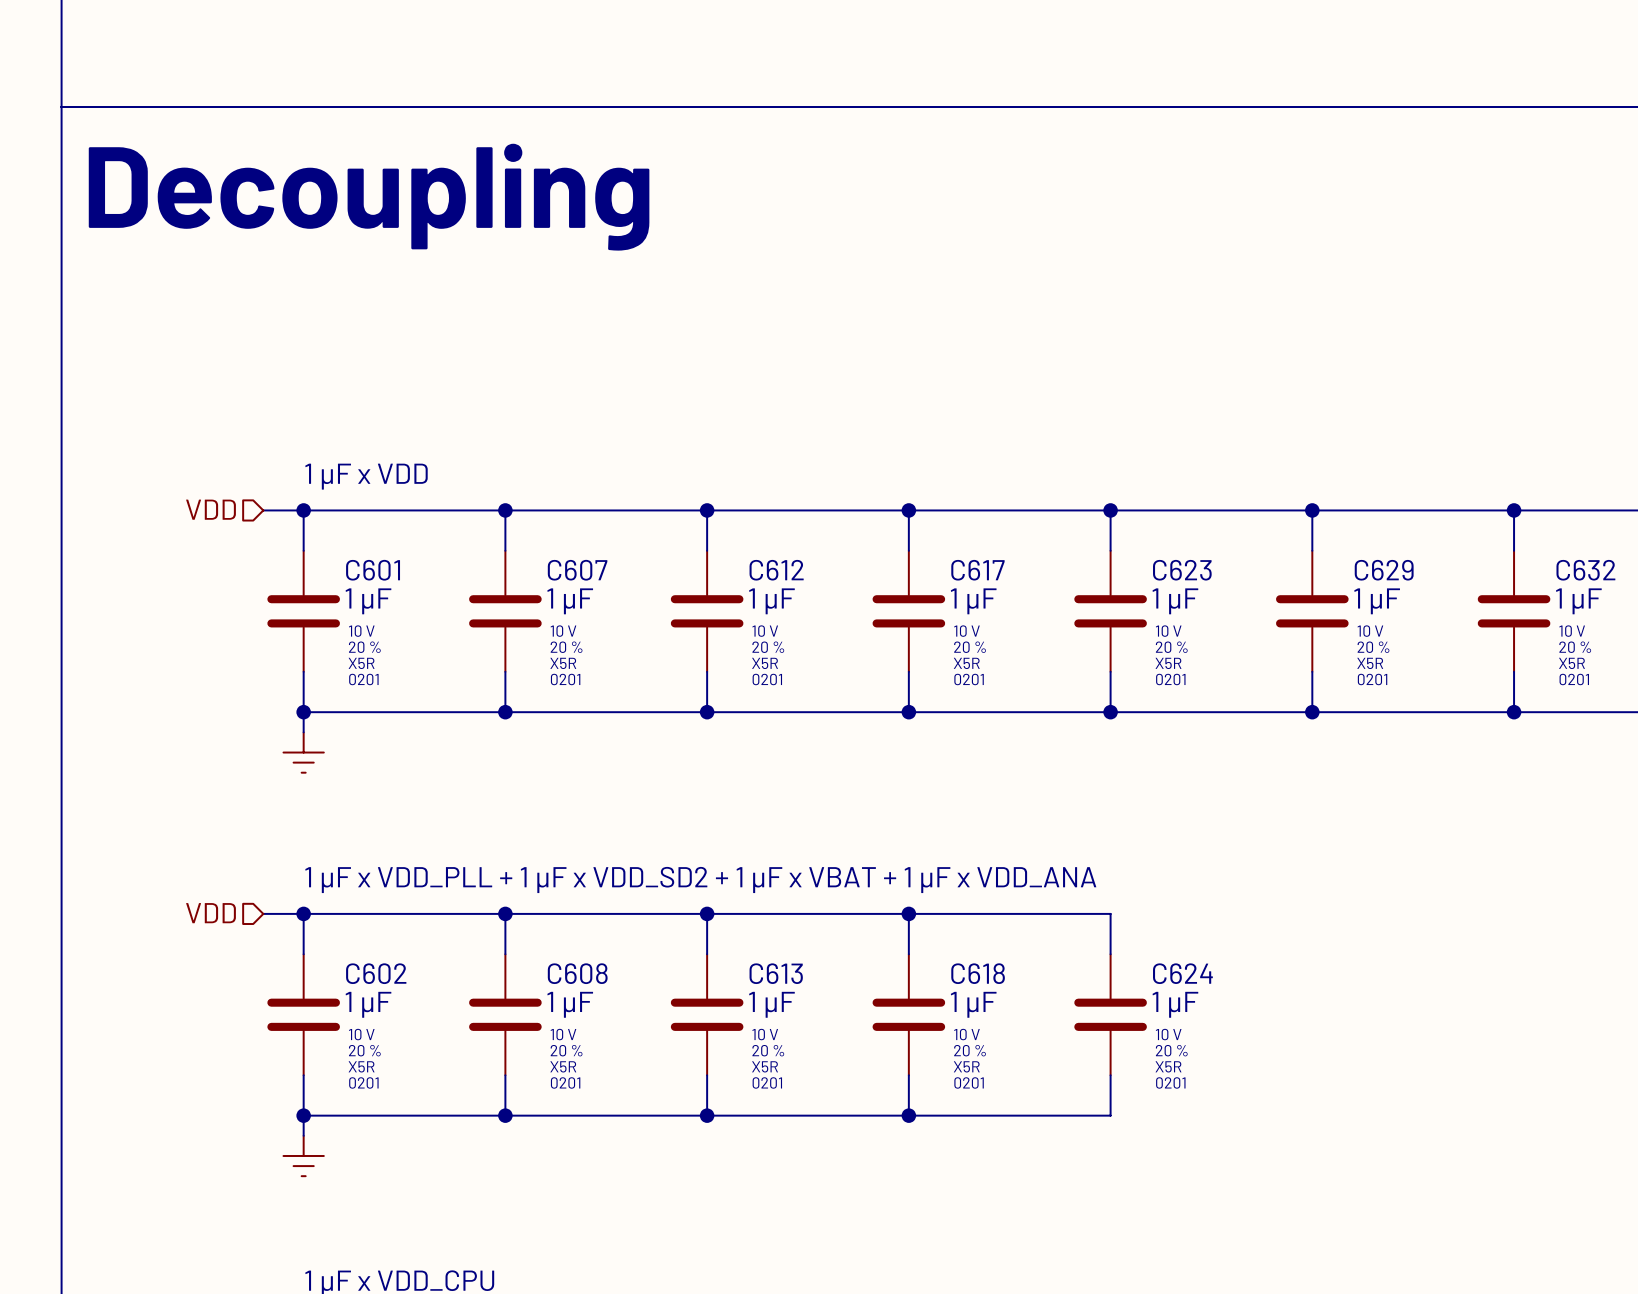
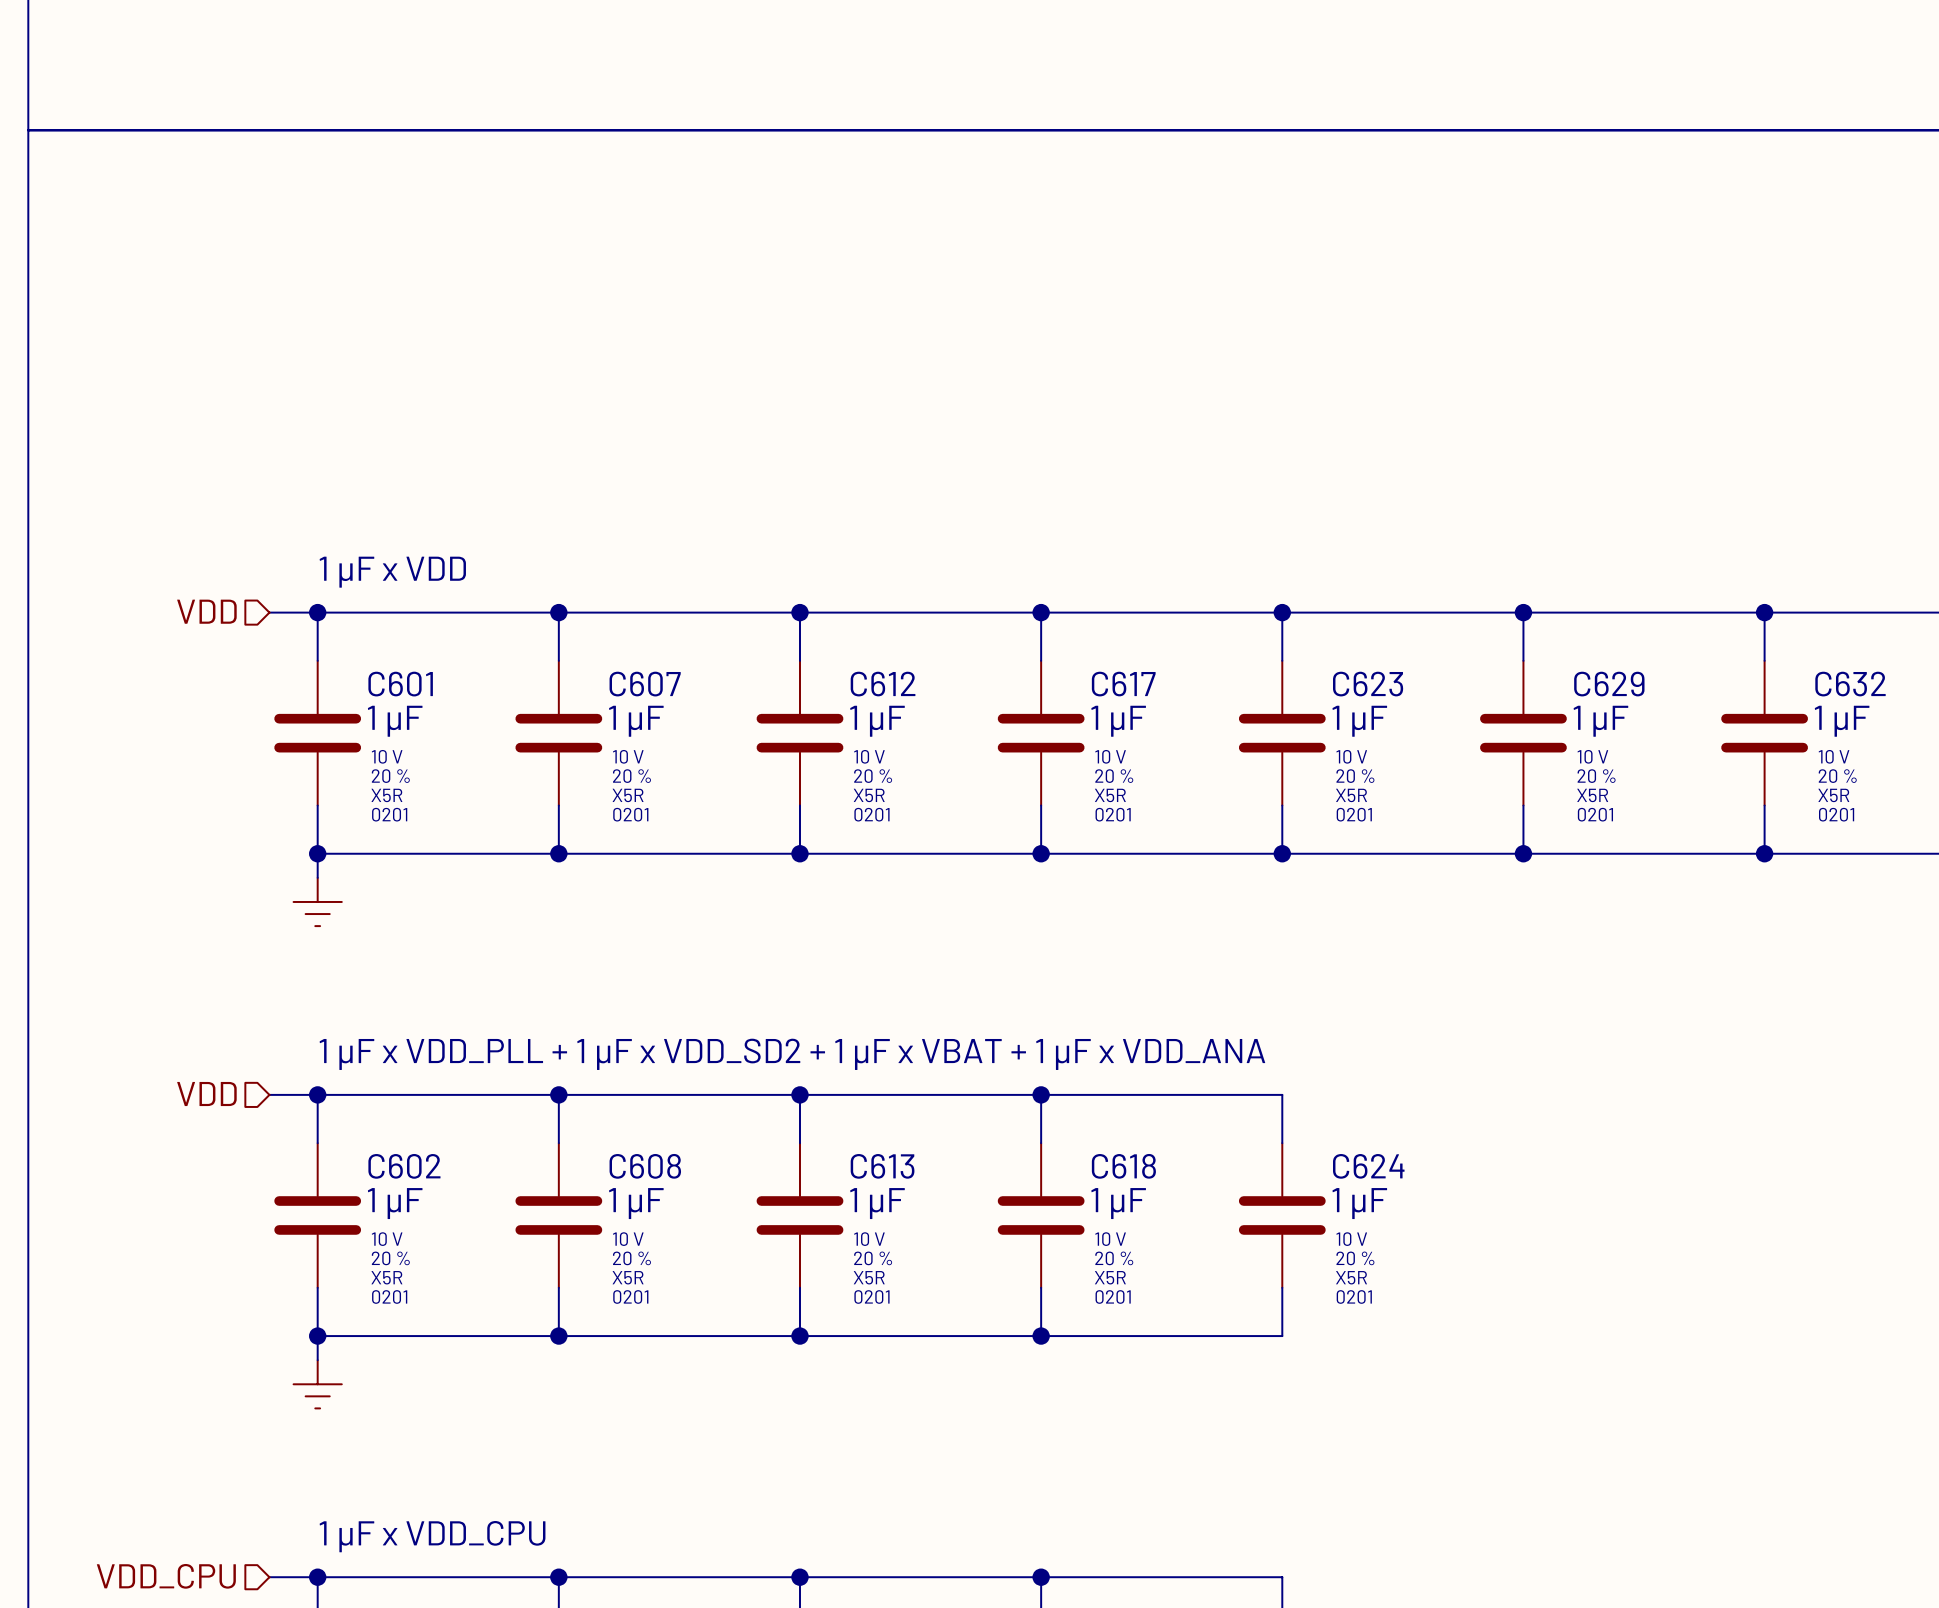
text: Decoupling (369, 197) -> none

